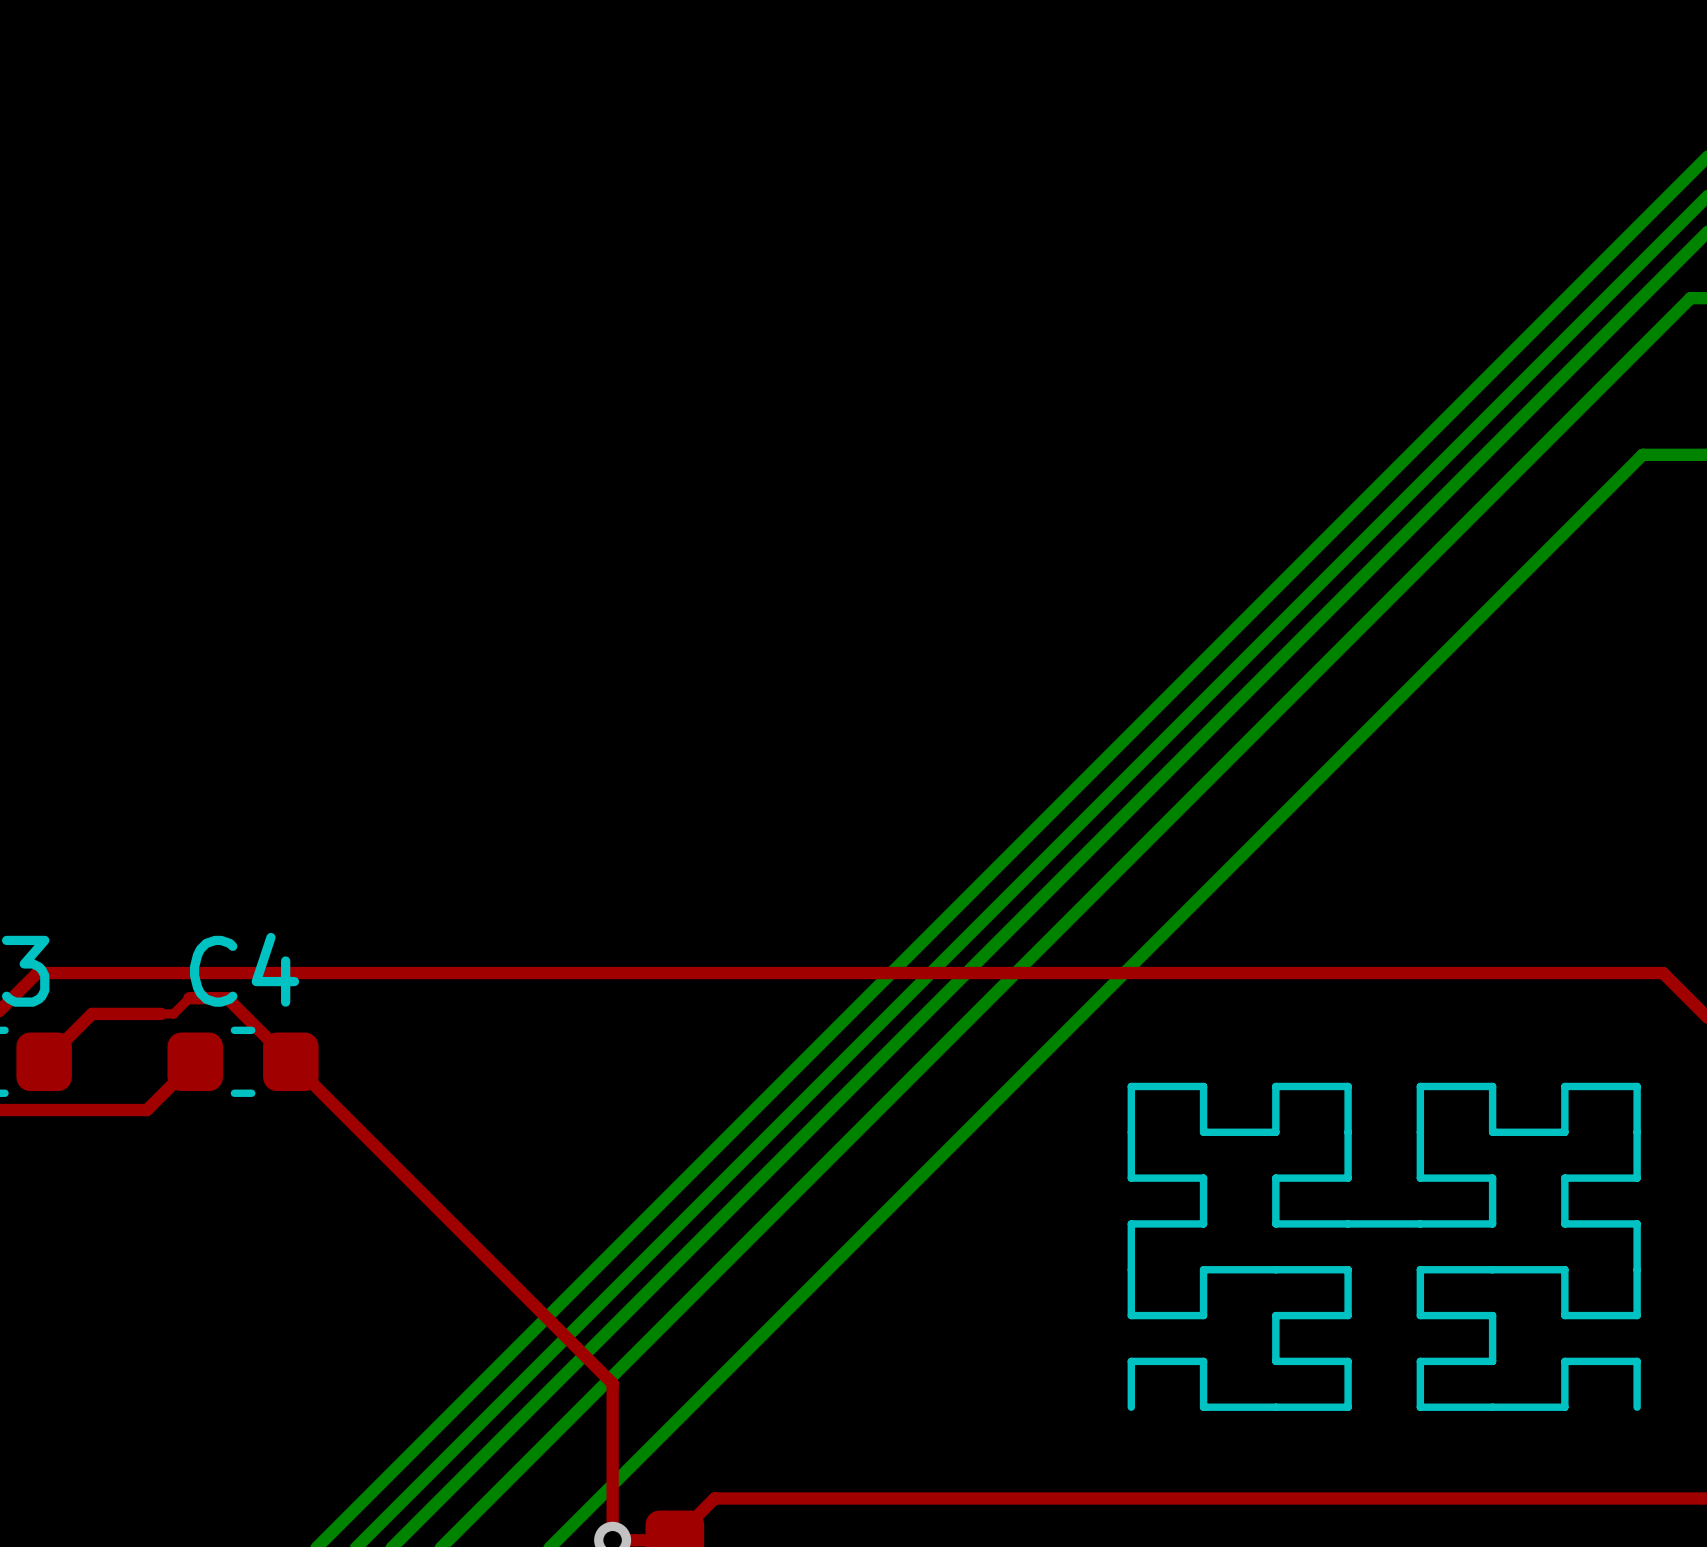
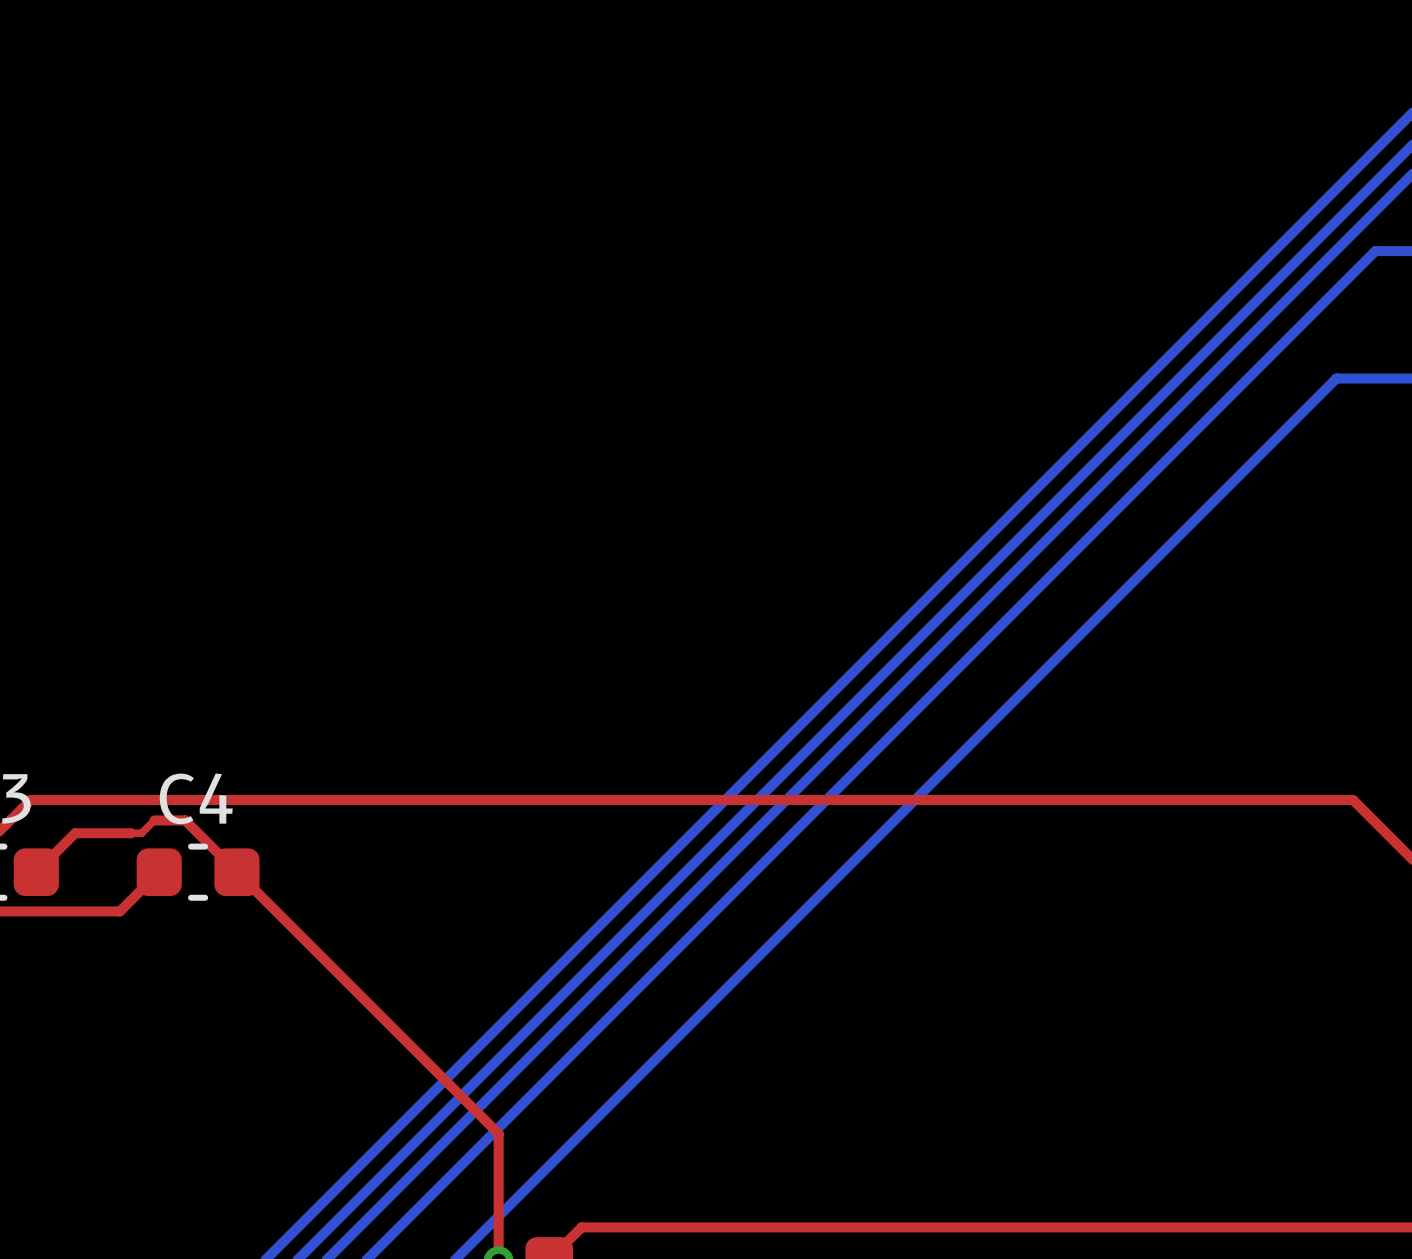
line: (1131, 1407) (1131, 1361) (1203, 1361) (1203, 1407) (1348, 1407) (1348, 1361) (1275, 1361) (1275, 1315) (1348, 1315) (1348, 1269) (1203, 1269) (1203, 1315) (1131, 1315) (1131, 1223) (1203, 1223) (1203, 1178) (1131, 1178) (1131, 1086) (1203, 1086) (1203, 1132) (1275, 1132) (1275, 1086) (1348, 1086) (1348, 1178) (1275, 1178) (1275, 1223) (1492, 1223) (1492, 1178) (1420, 1178) (1420, 1086) (1492, 1086) (1492, 1132) (1564, 1132) (1564, 1086) (1637, 1086) (1637, 1178) (1564, 1178) (1564, 1223) (1637, 1223) (1637, 1315) (1564, 1315) (1564, 1269) (1420, 1269) (1420, 1315) (1492, 1315) (1492, 1361) (1420, 1361) (1420, 1407) (1564, 1407) (1564, 1361) (1637, 1361) (1637, 1407) -> none

